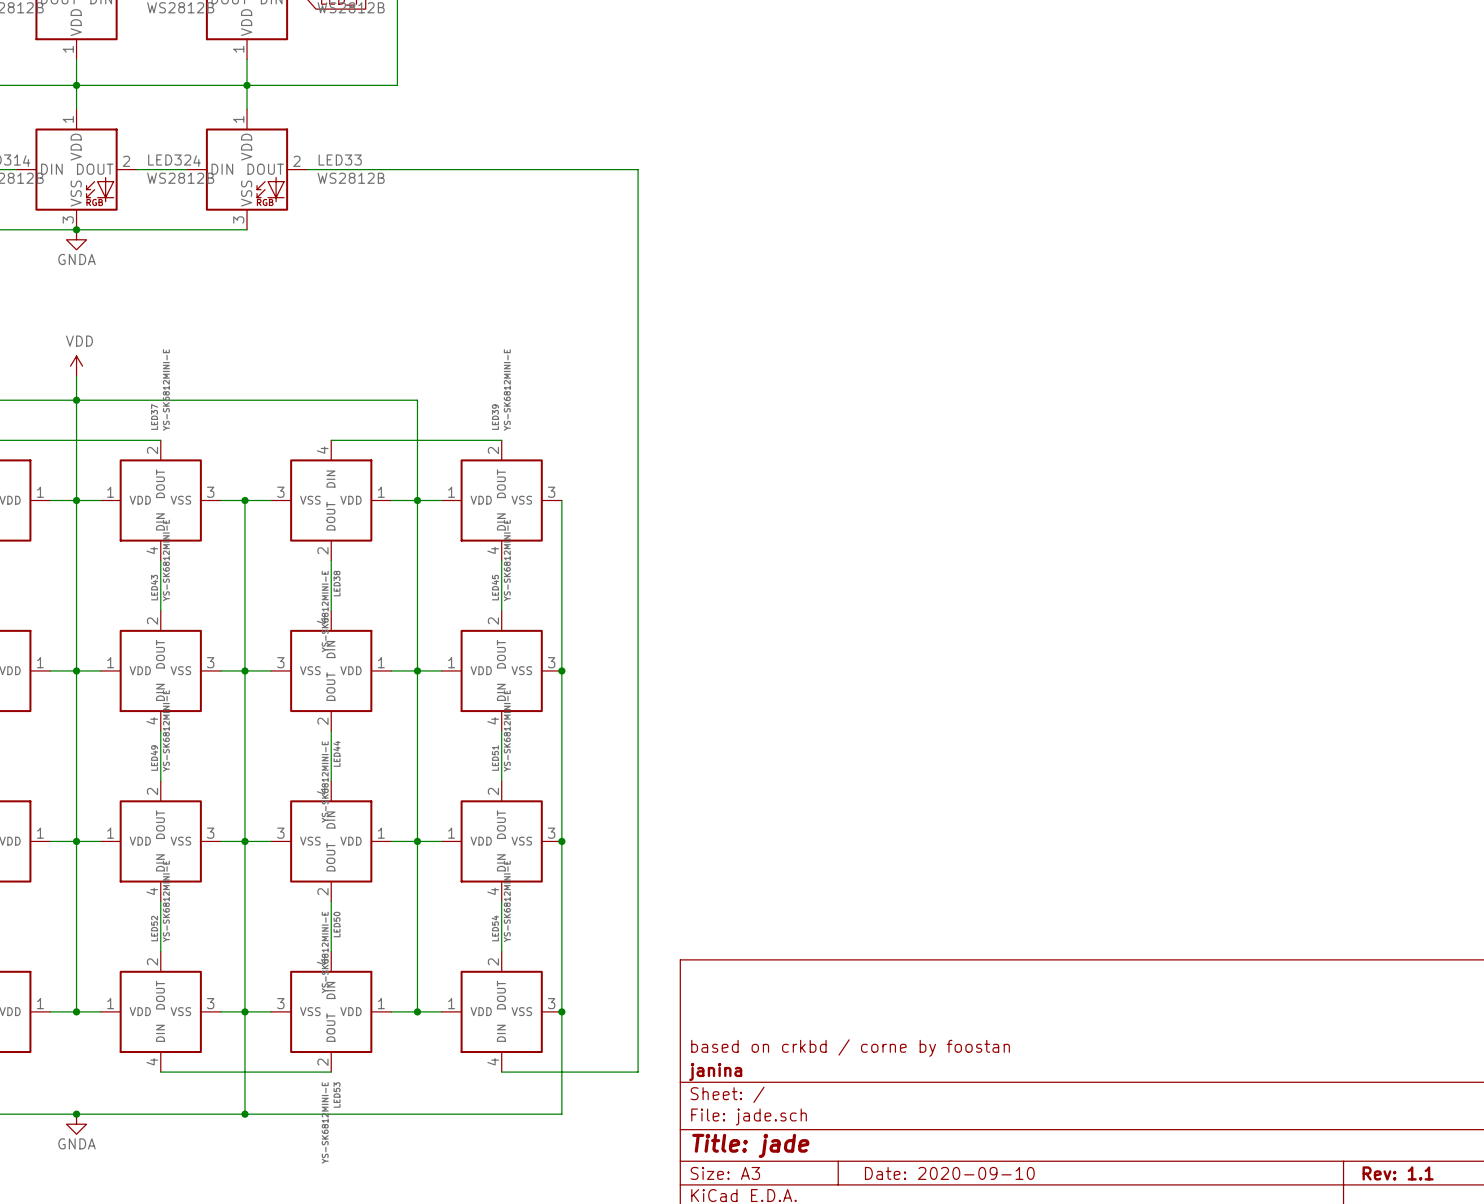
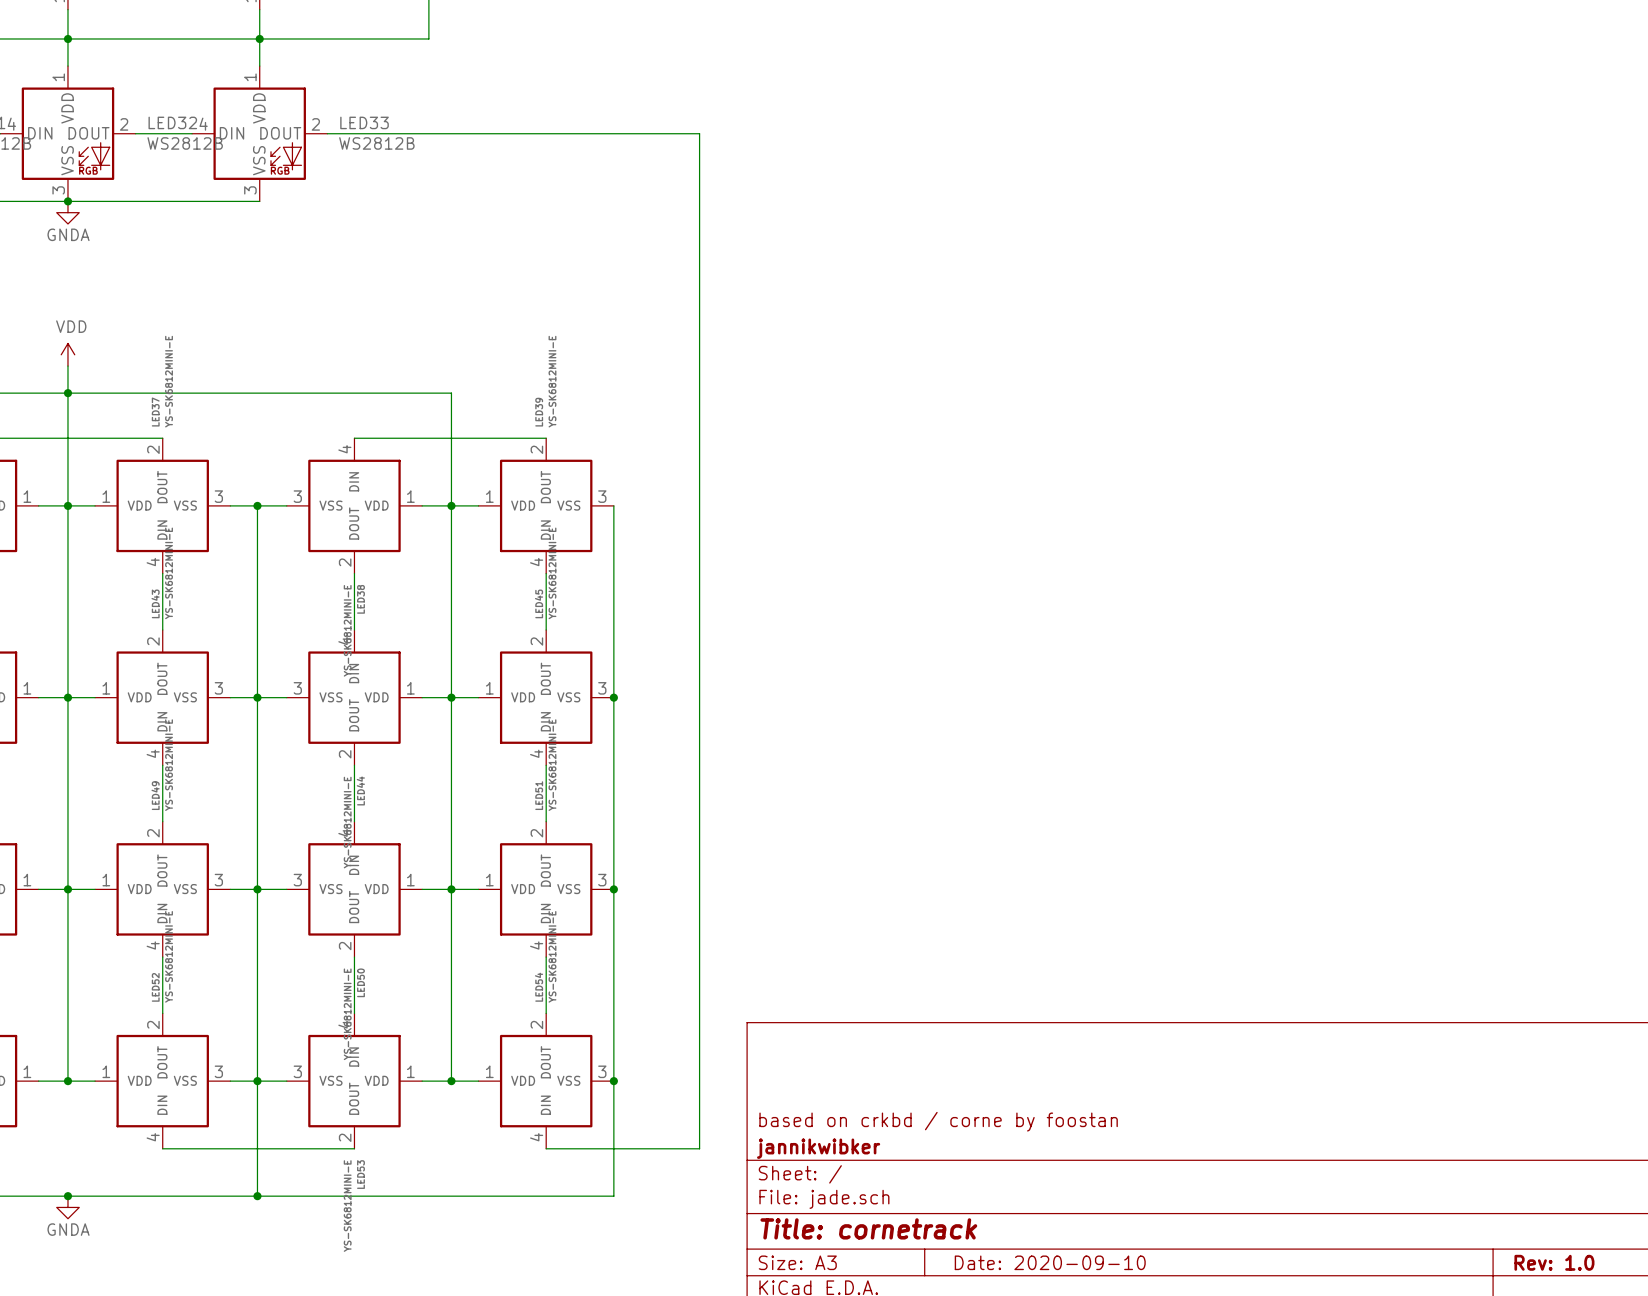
title block: janina (715, 1071) -> jannikwibker (818, 1148)
title block: Title: jade (750, 1145) -> Title: cornetrack (868, 1228)
title block: Rev: 1.1 (1398, 1173) -> Rev: 1.0 (1554, 1262)

